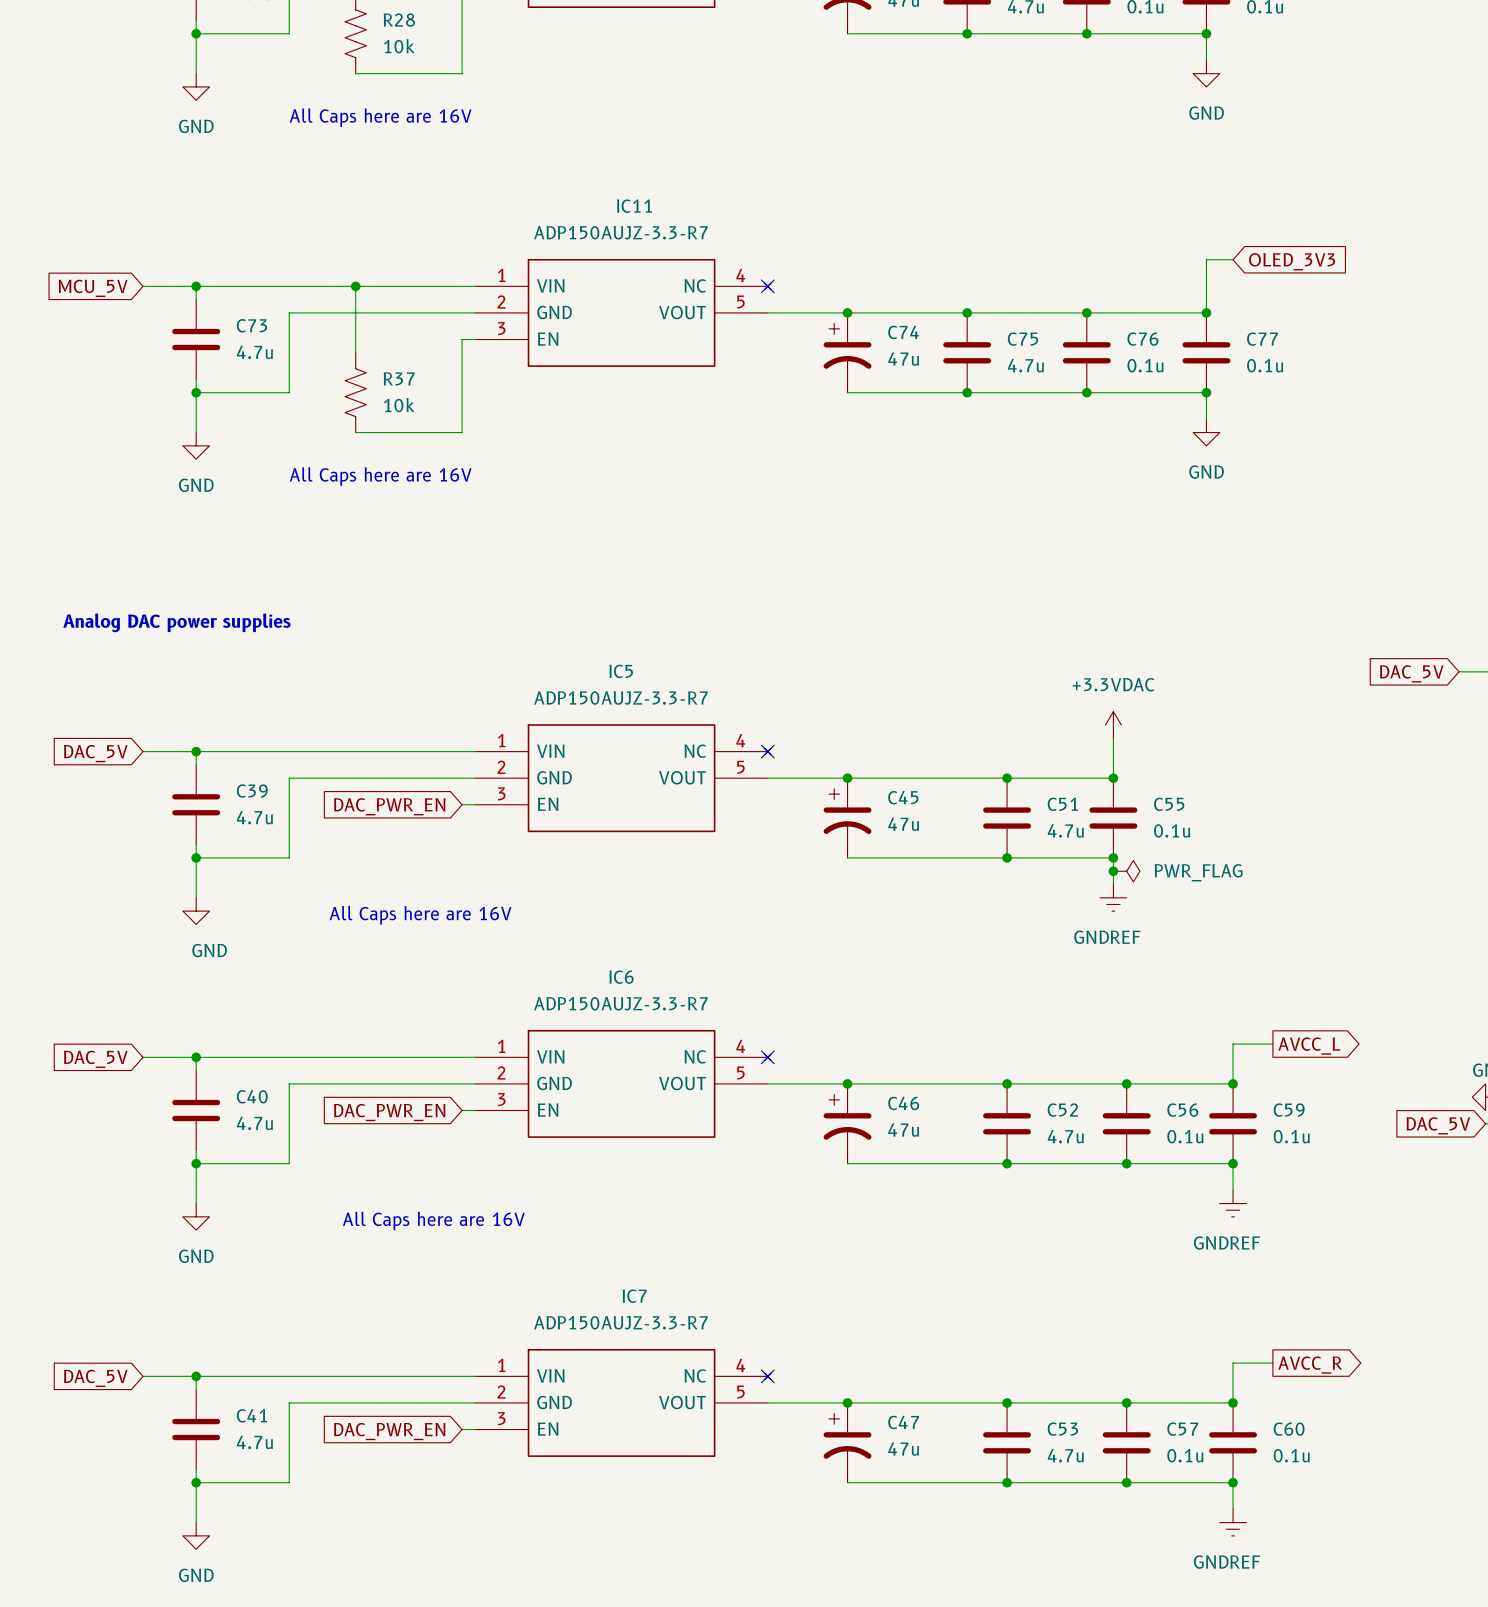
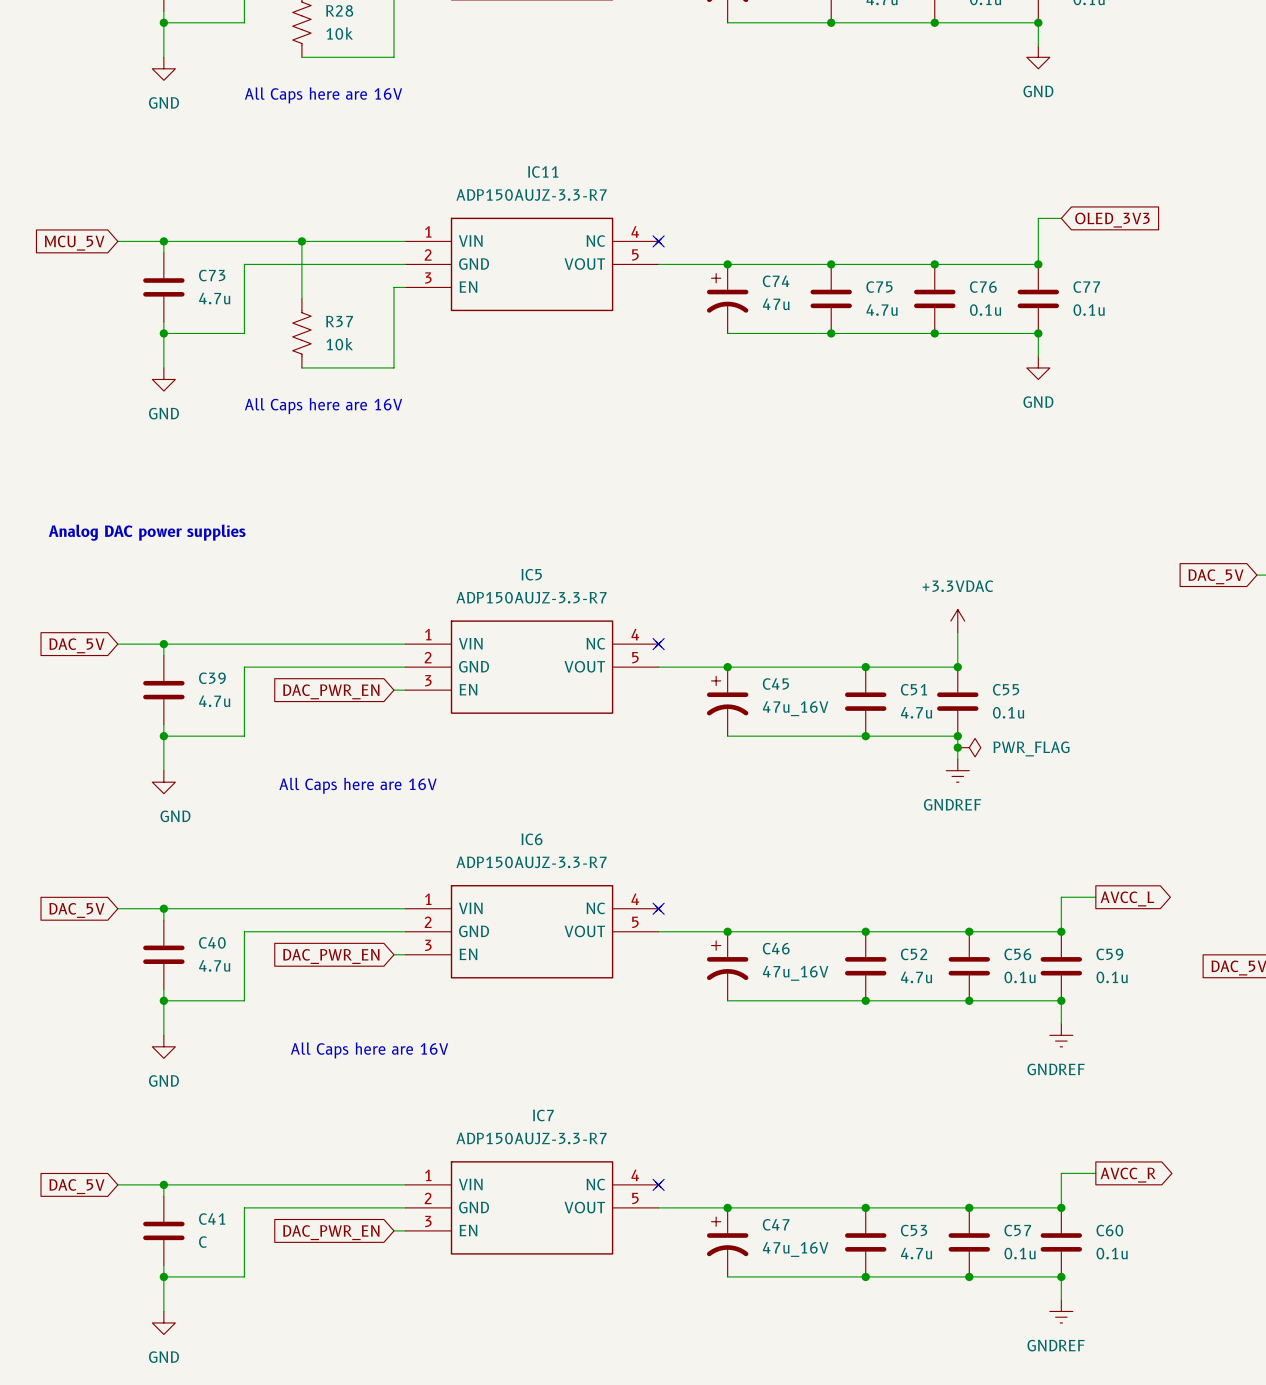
C45 value: 47u (903, 824) -> 47u_16V (795, 708)
C46 value: 47u (903, 1130) -> 47u_16V (795, 973)
C41 value: 4.7u (254, 1442) -> C (202, 1242)
C47 value: 47u (903, 1449) -> 47u_16V (795, 1249)

